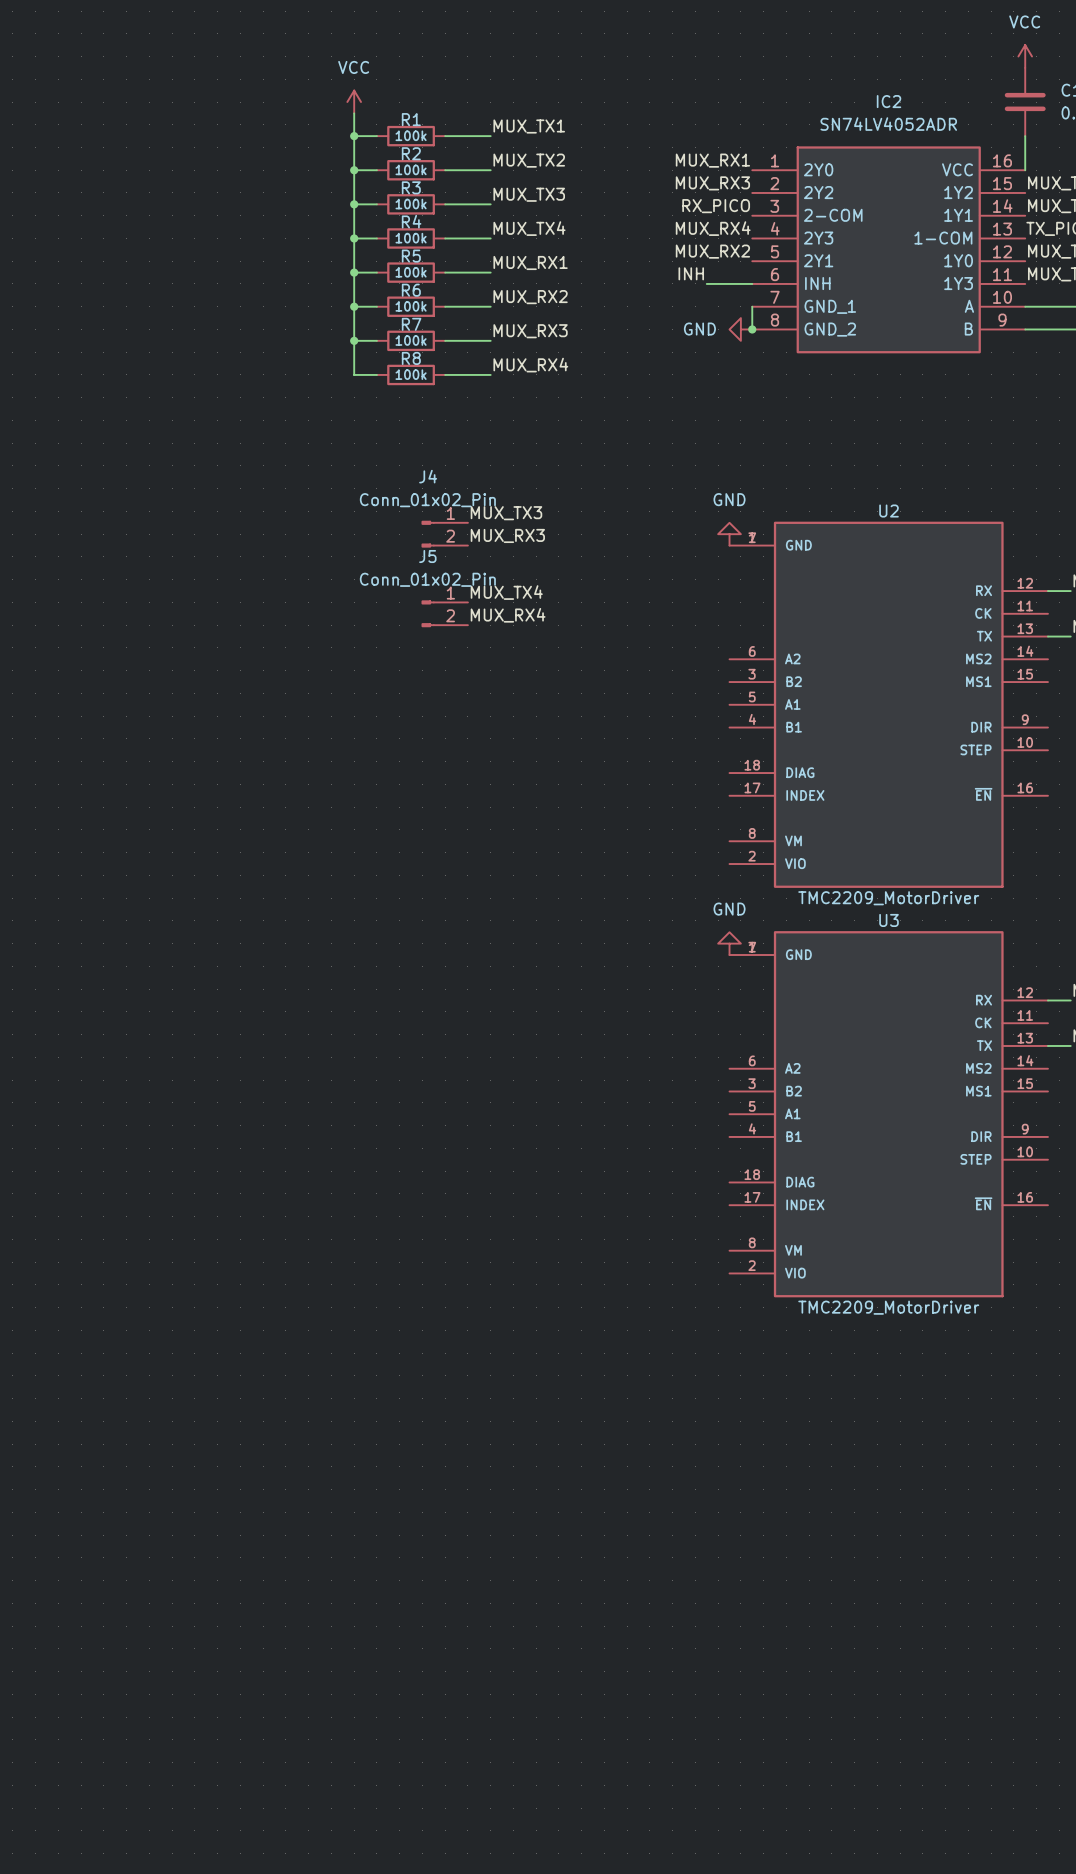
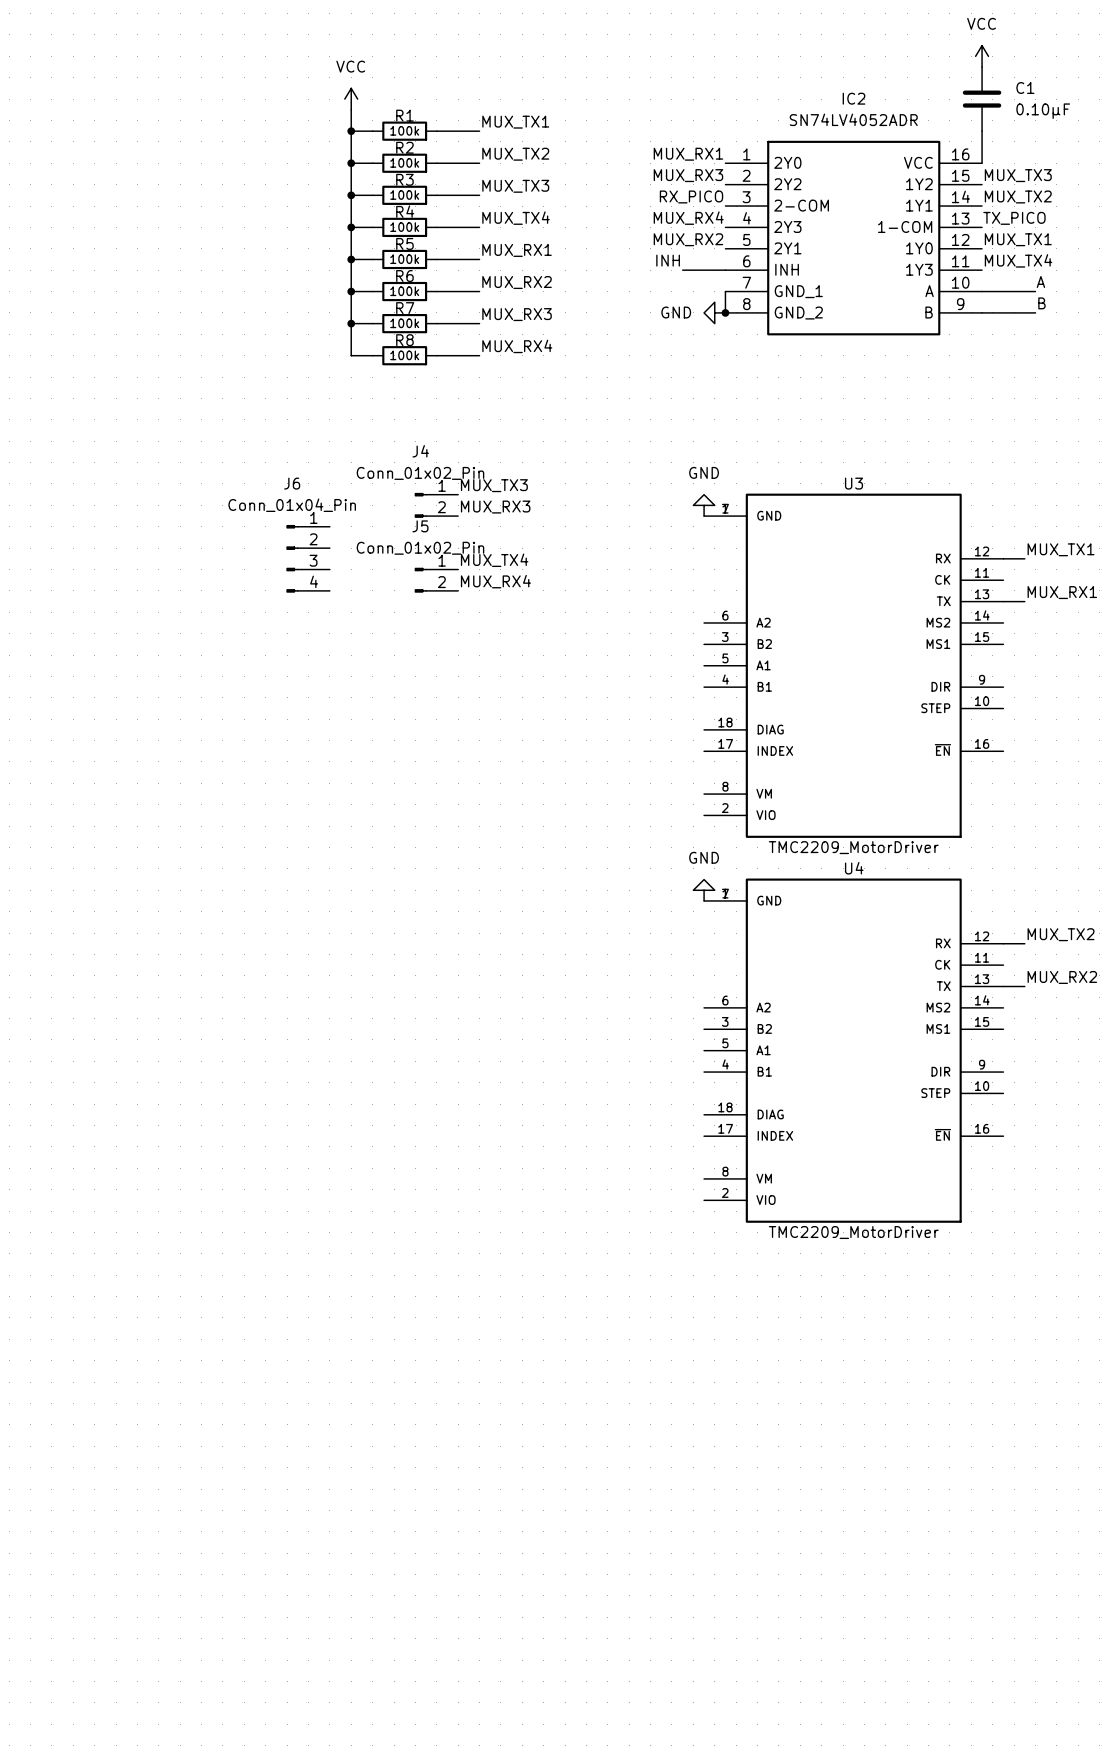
U2 name: U2 (889, 511) -> U3 (854, 483)
J6: none -> Conn_01x04_Pin (308, 558)
U3 name: U3 (889, 920) -> U4 (854, 868)

